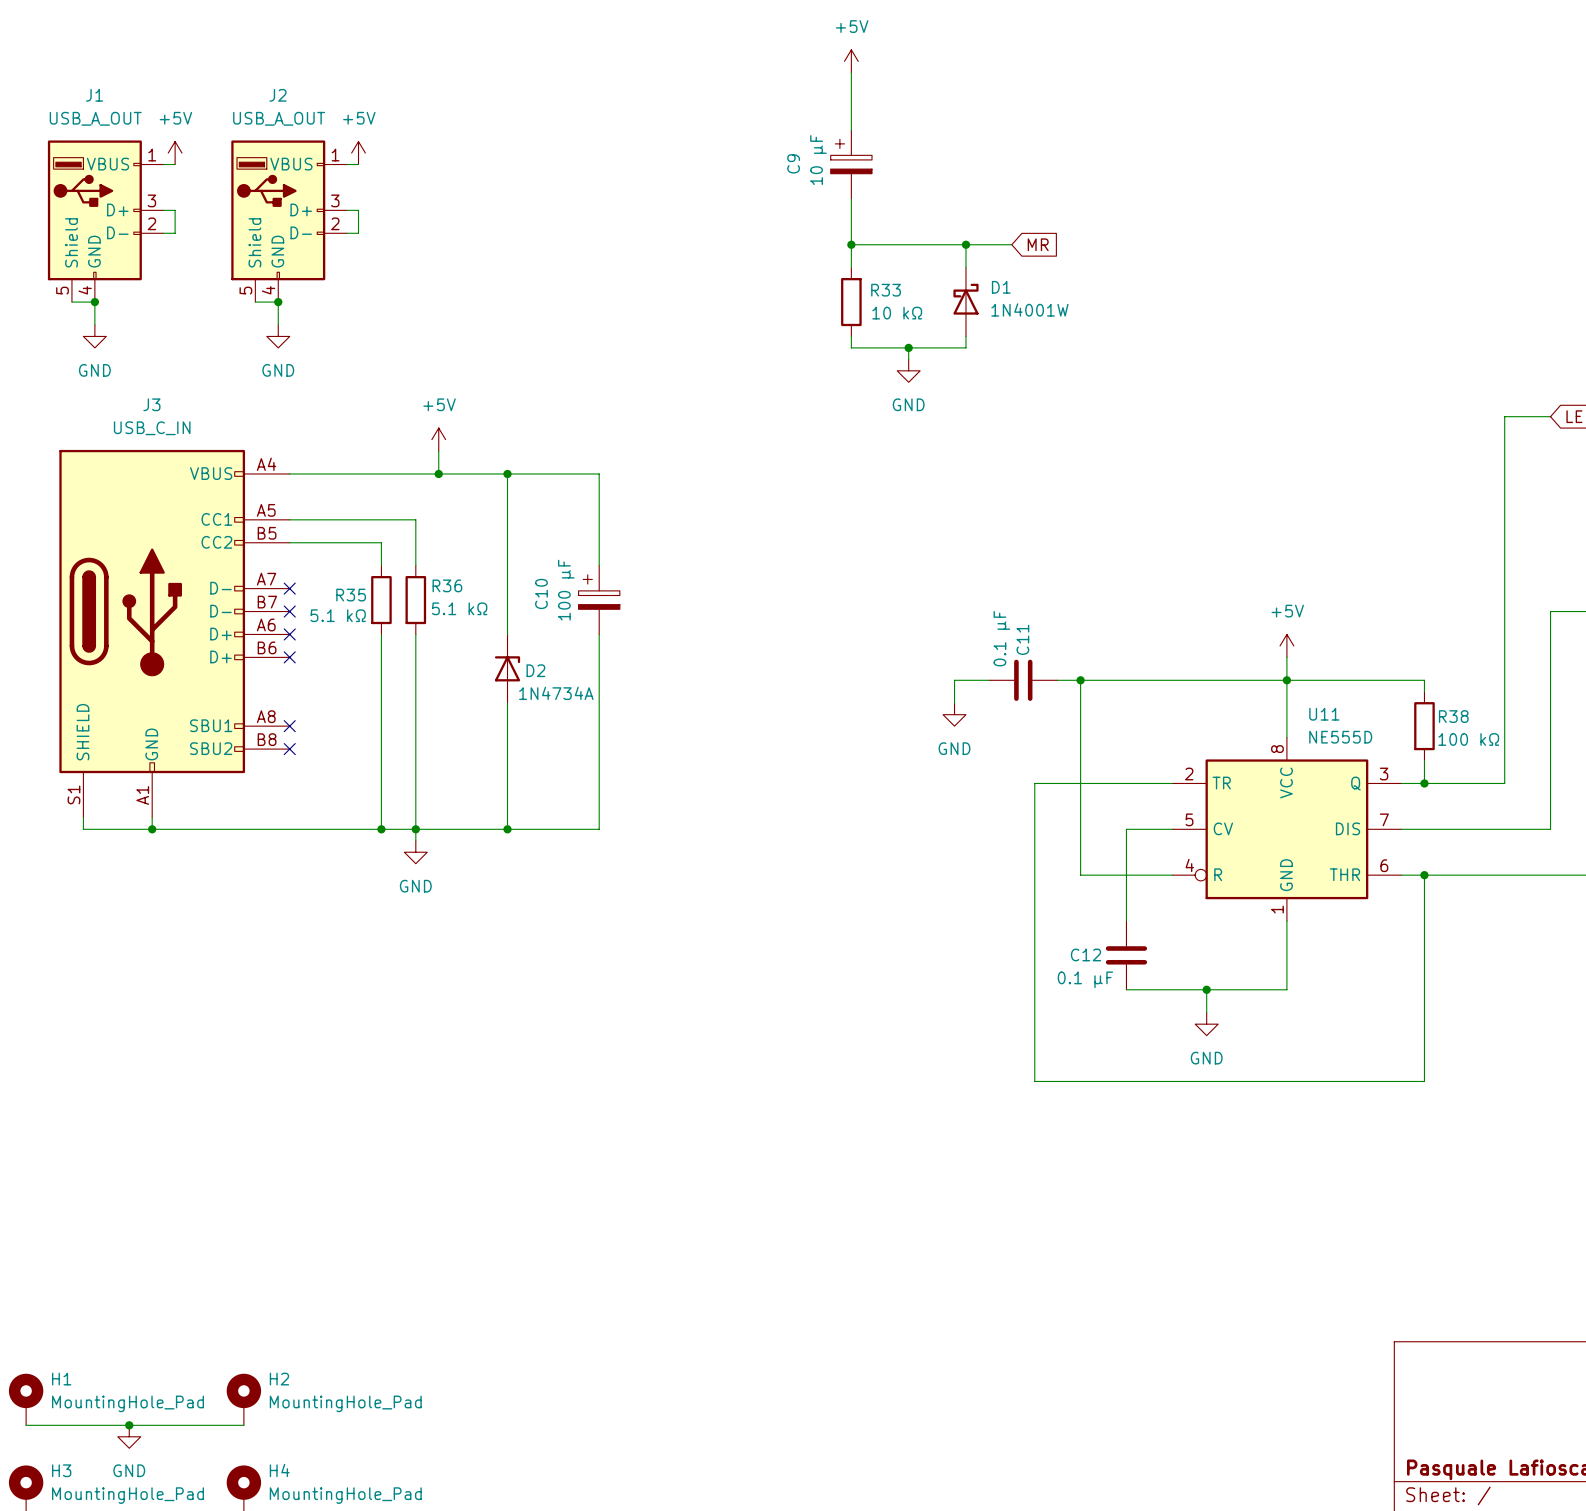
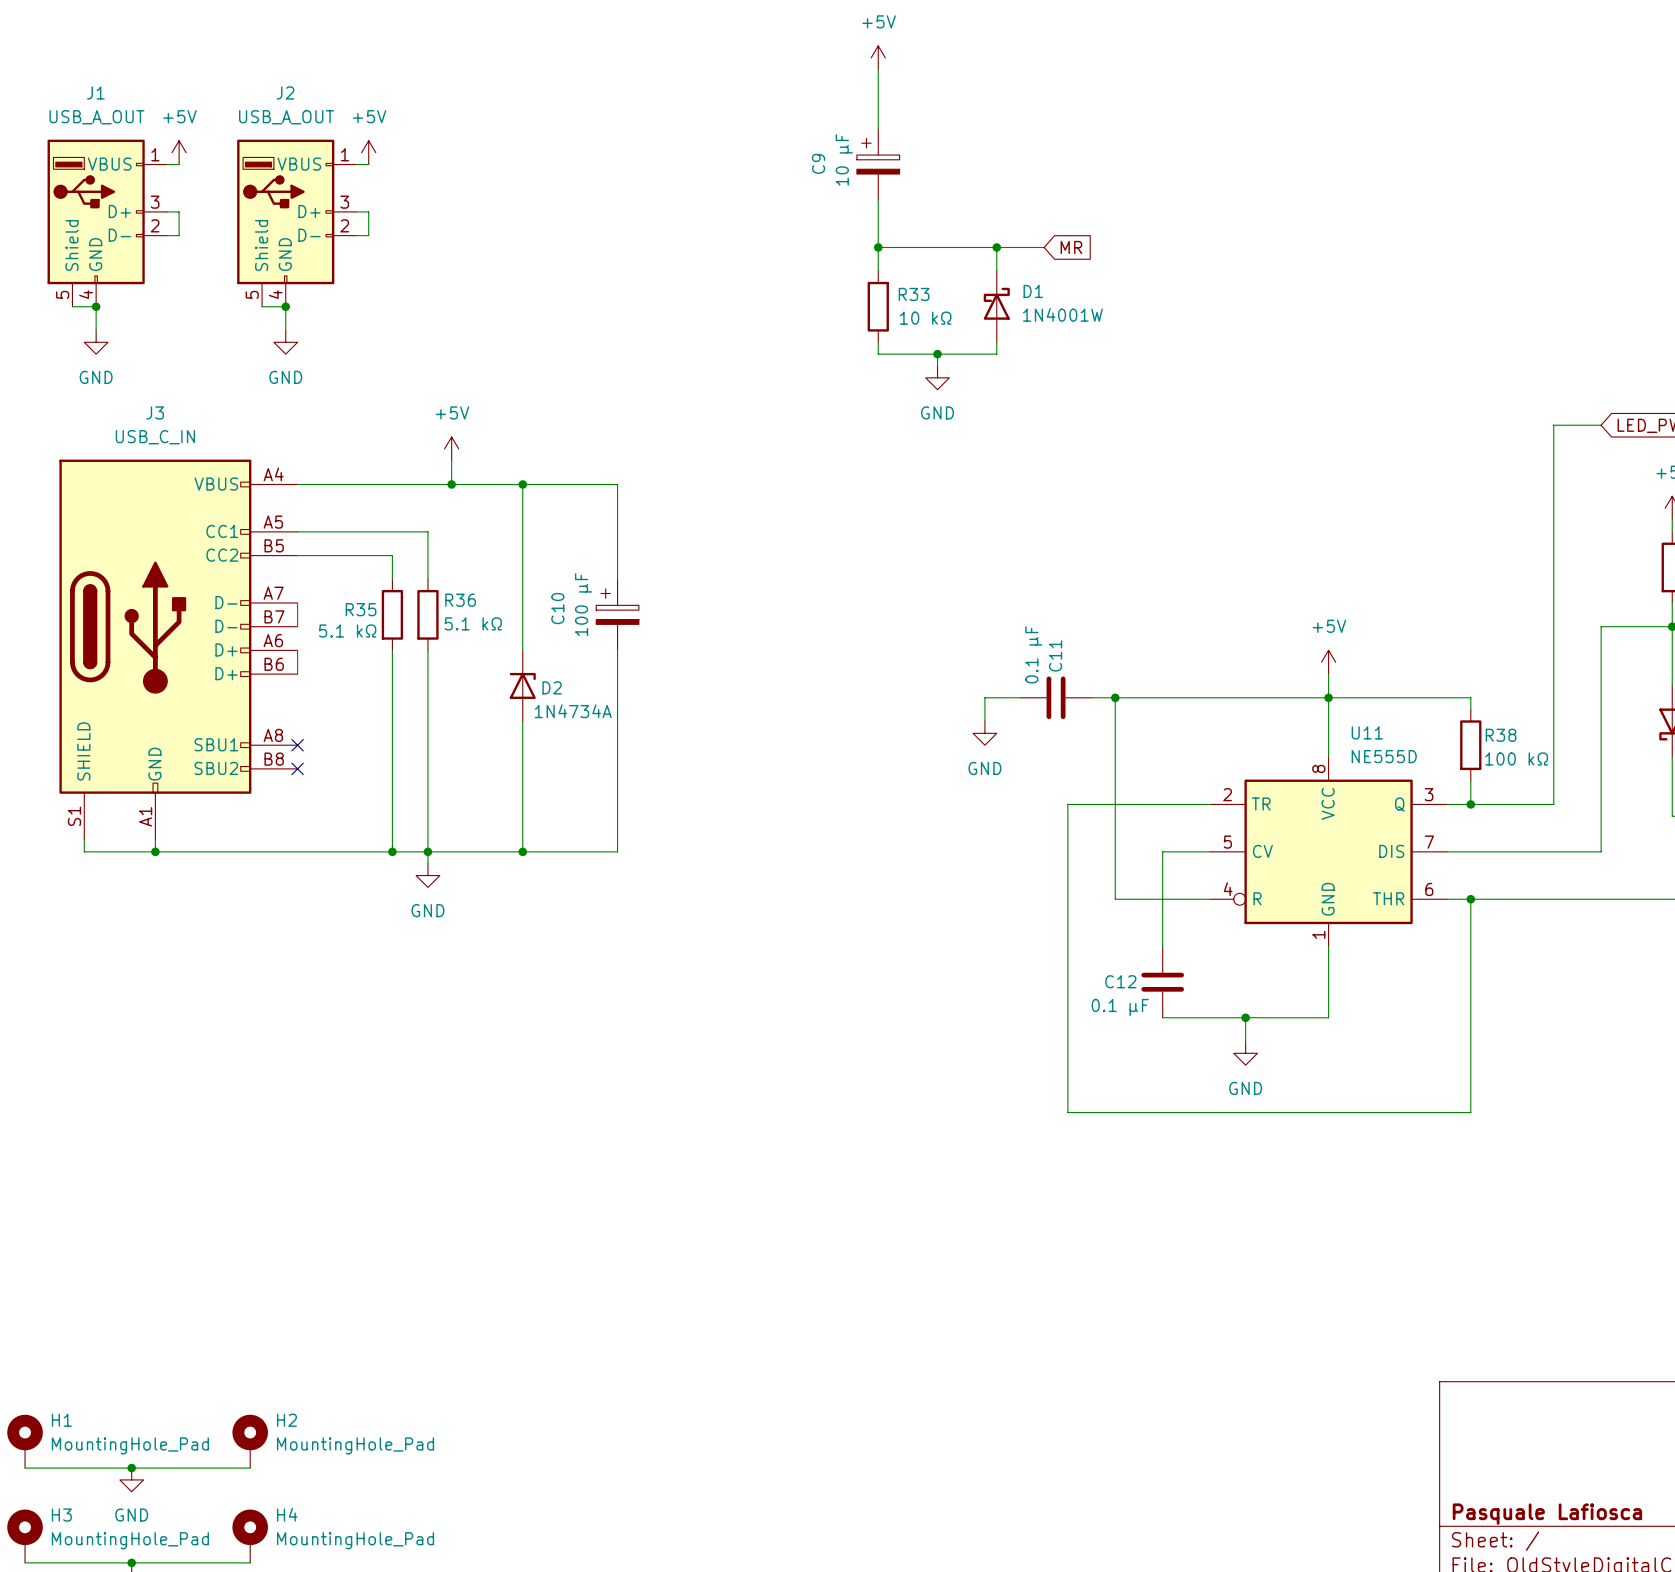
wire: none -> (297, 602) (297, 626)
no-connect mark: (289, 588) -> none
no-connect mark: (289, 611) -> none
wire: none -> (297, 650) (297, 674)
no-connect mark: (289, 634) -> none
no-connect mark: (289, 657) -> none

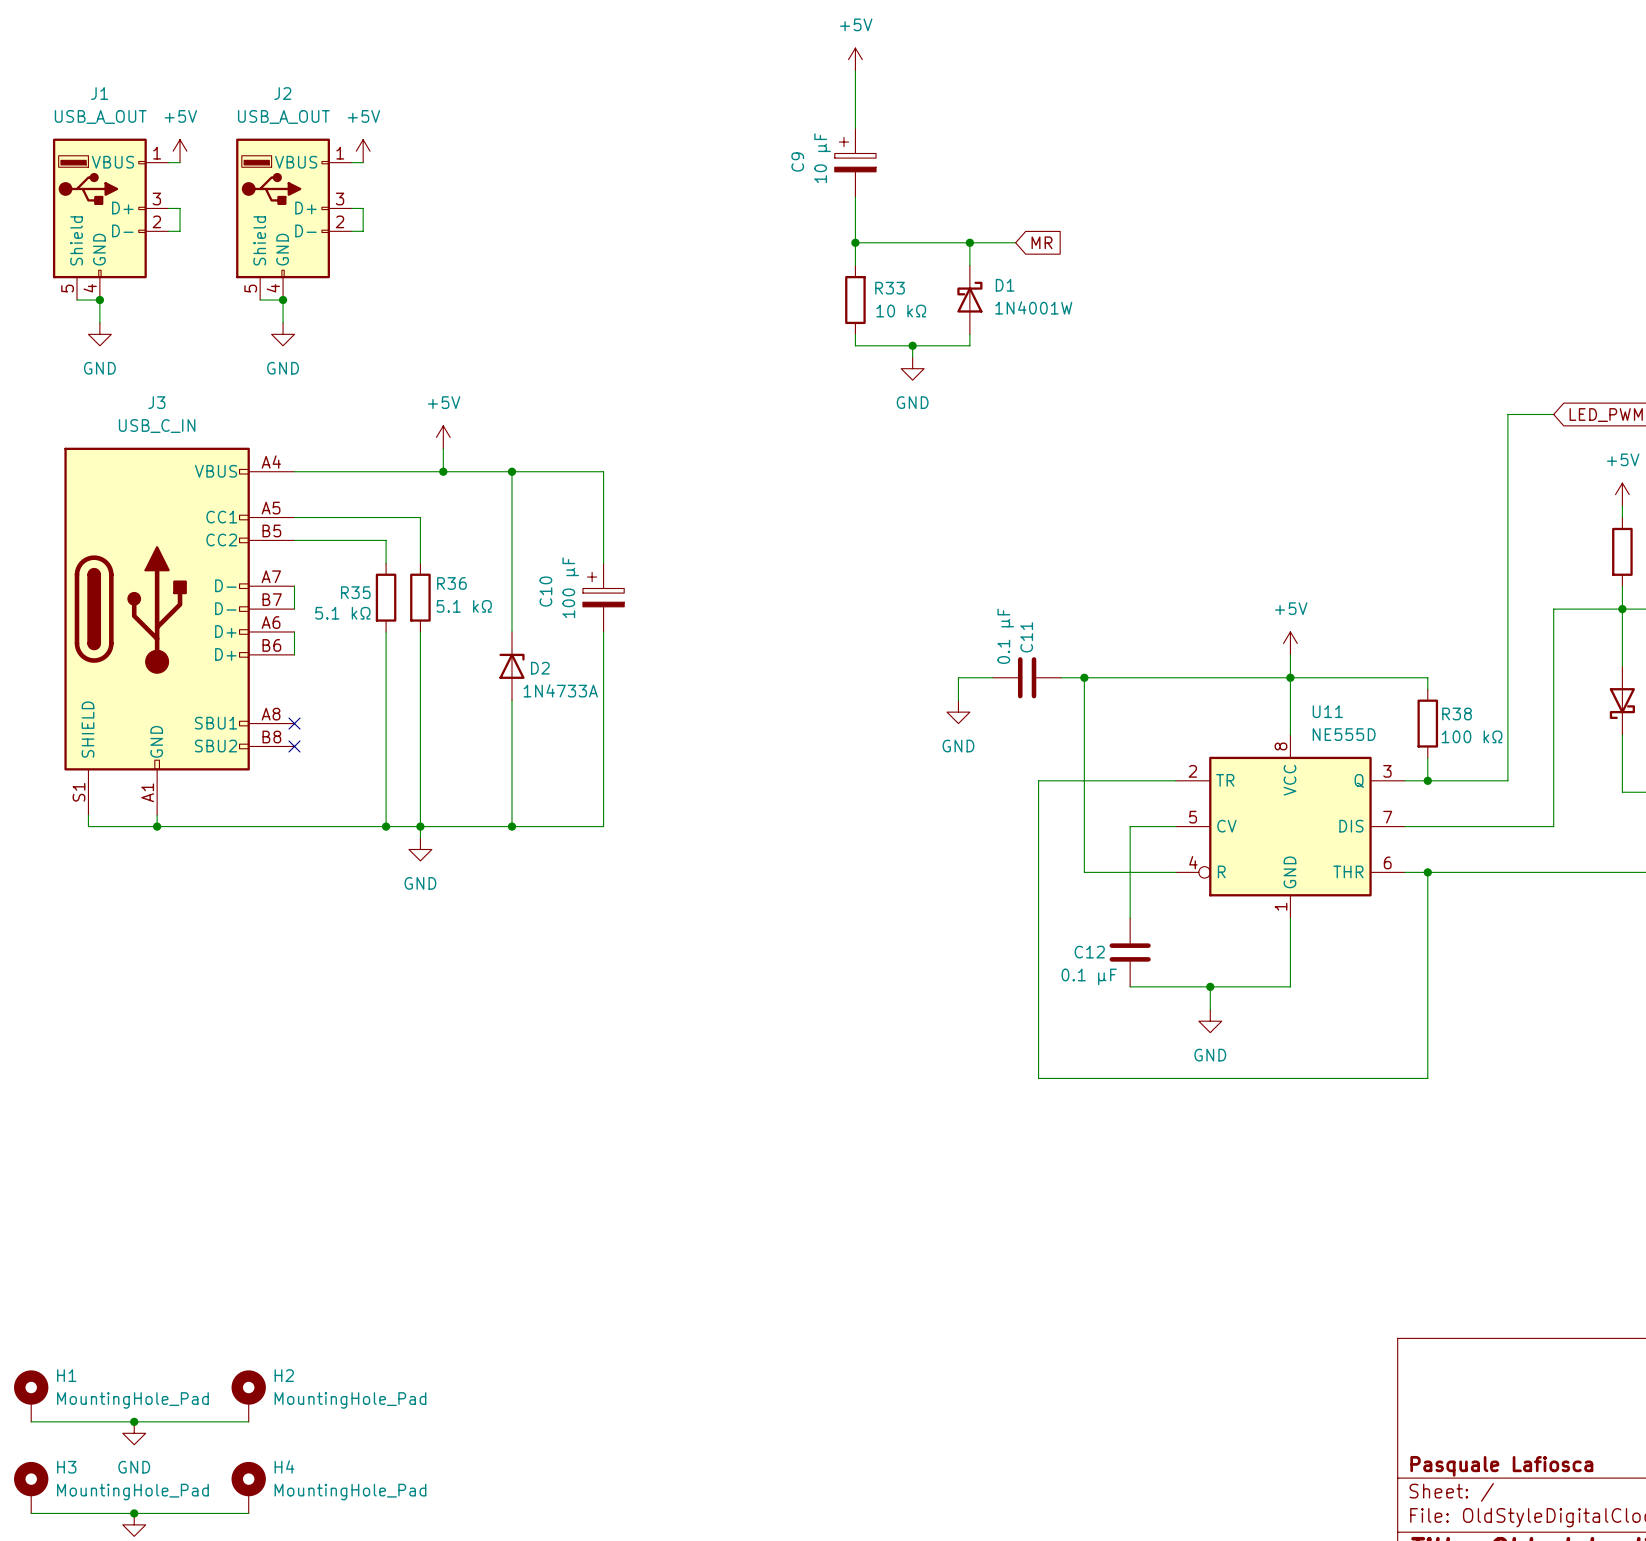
D2 value: 1N4734A (573, 711) -> 1N4733A (560, 690)

